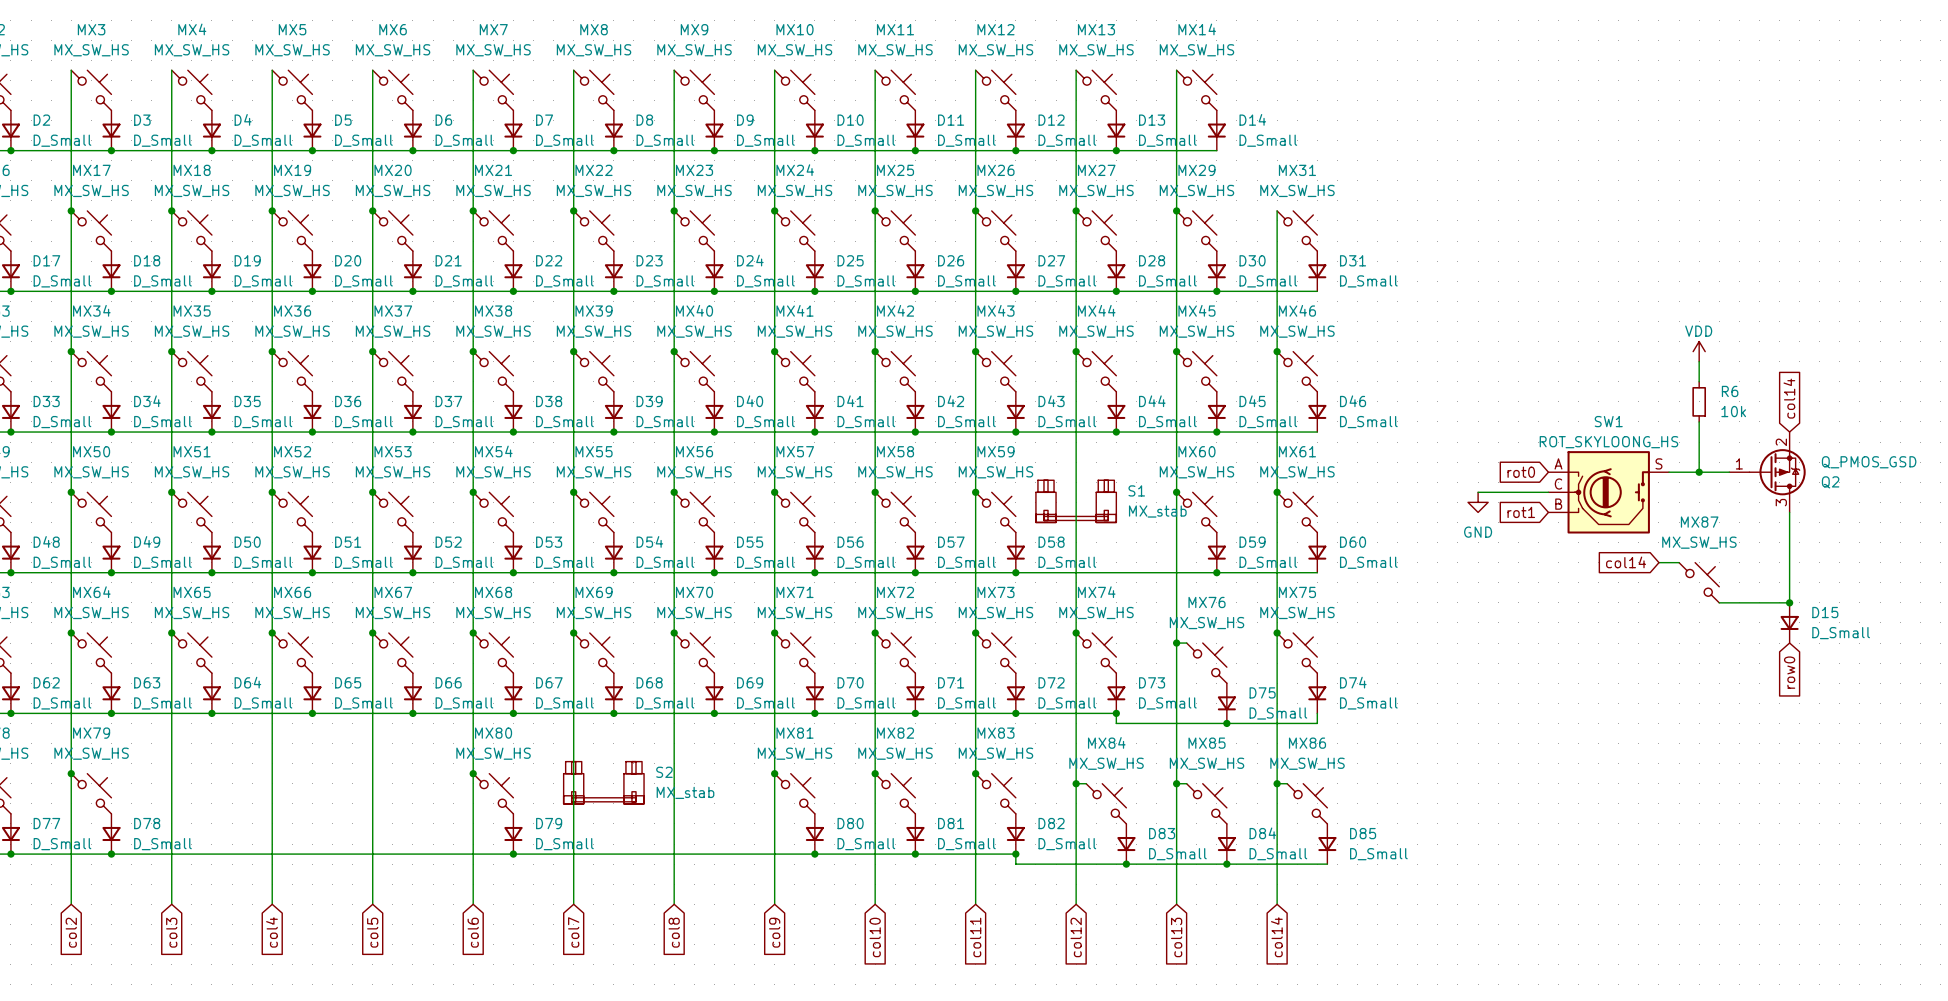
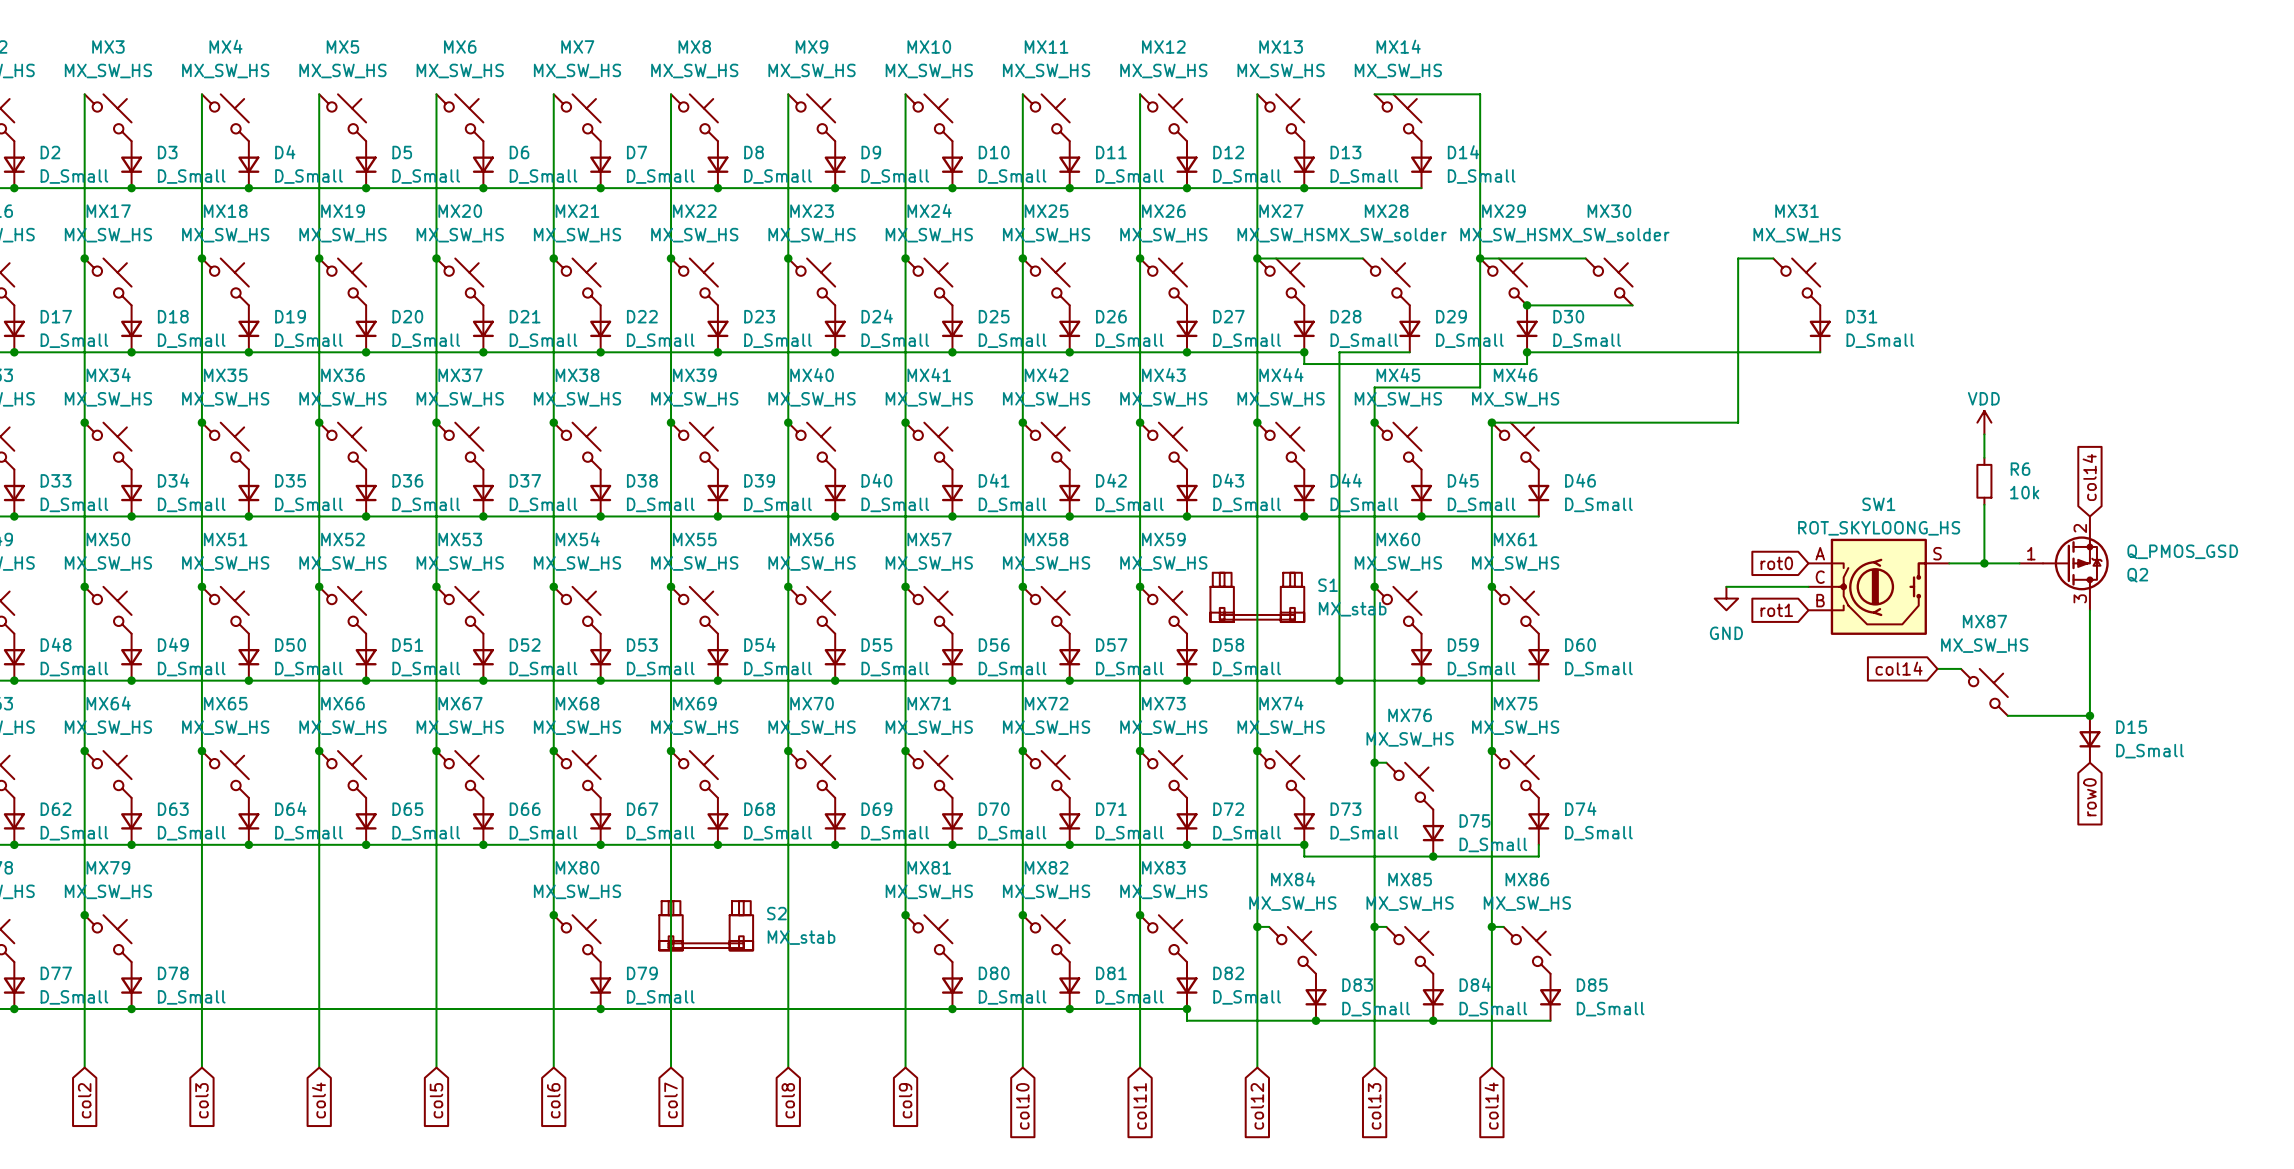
wire: (1176, 70) (1176, 321) -> (1374, 94) (1480, 94) (1480, 387) (1374, 387)
wire: none -> (1257, 258) (1362, 258)
junction: (1176, 210) -> none
wire: none -> (1480, 258) (1585, 258)
junction: none -> (1480, 258)
wire: (1277, 210) (1277, 351) -> (1773, 258) (1738, 258) (1738, 422) (1491, 422)
MX28: none -> MX_SW_solder (1386, 281)
MX29 position: (1196, 231) -> (1503, 281)
MX31 position: (1297, 231) -> (1796, 281)
MX30: none -> MX_SW_solder (1609, 281)
wire: none -> (1527, 305) (1632, 305)
junction: none -> (1527, 305)
D29: none -> D_Small (1409, 328)
D30 position: (1216, 271) -> (1527, 328)
D31 position: (1317, 271) -> (1820, 328)
wire: (1116, 291) (1146, 291) -> (1339, 680) (1339, 352)
wire: (1206, 291) (1307, 291) -> (1304, 352) (1304, 364) (1527, 364) (1527, 352)
junction: (1216, 291) -> none
junction: none -> (1527, 352)
wire: none -> (1538, 352) (1820, 352)
junction: none -> (1339, 680)

